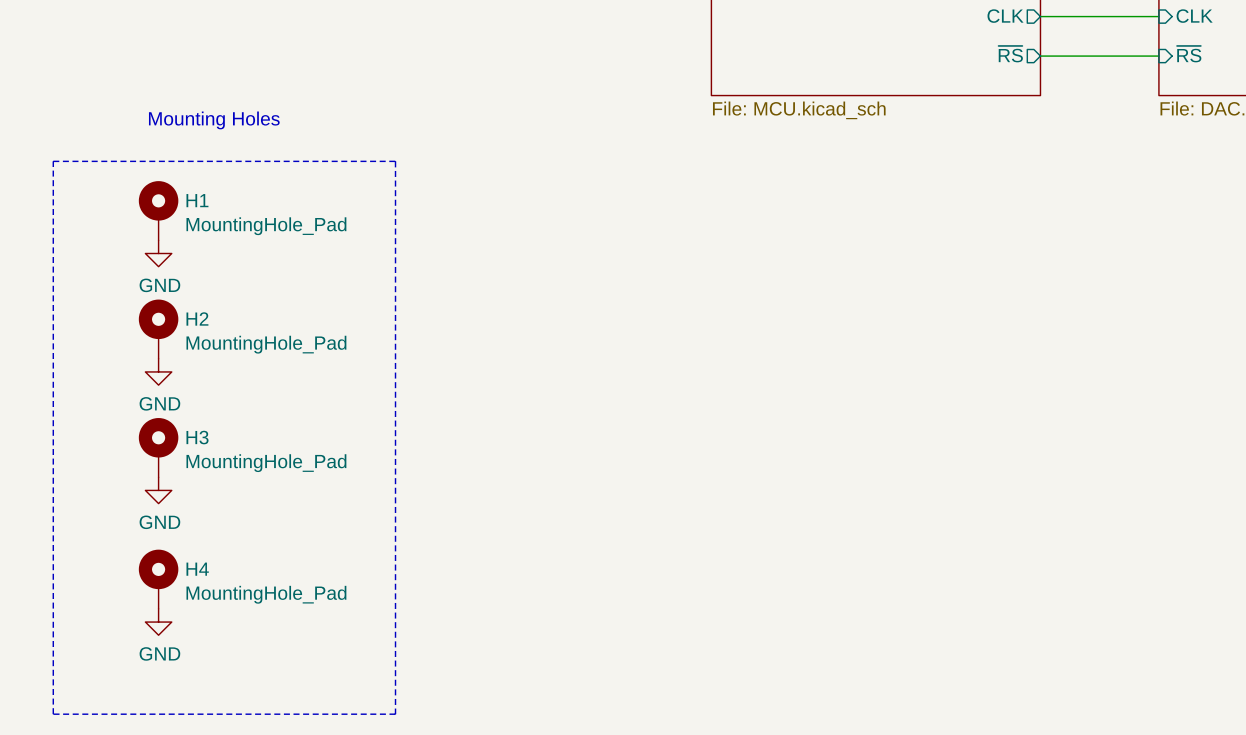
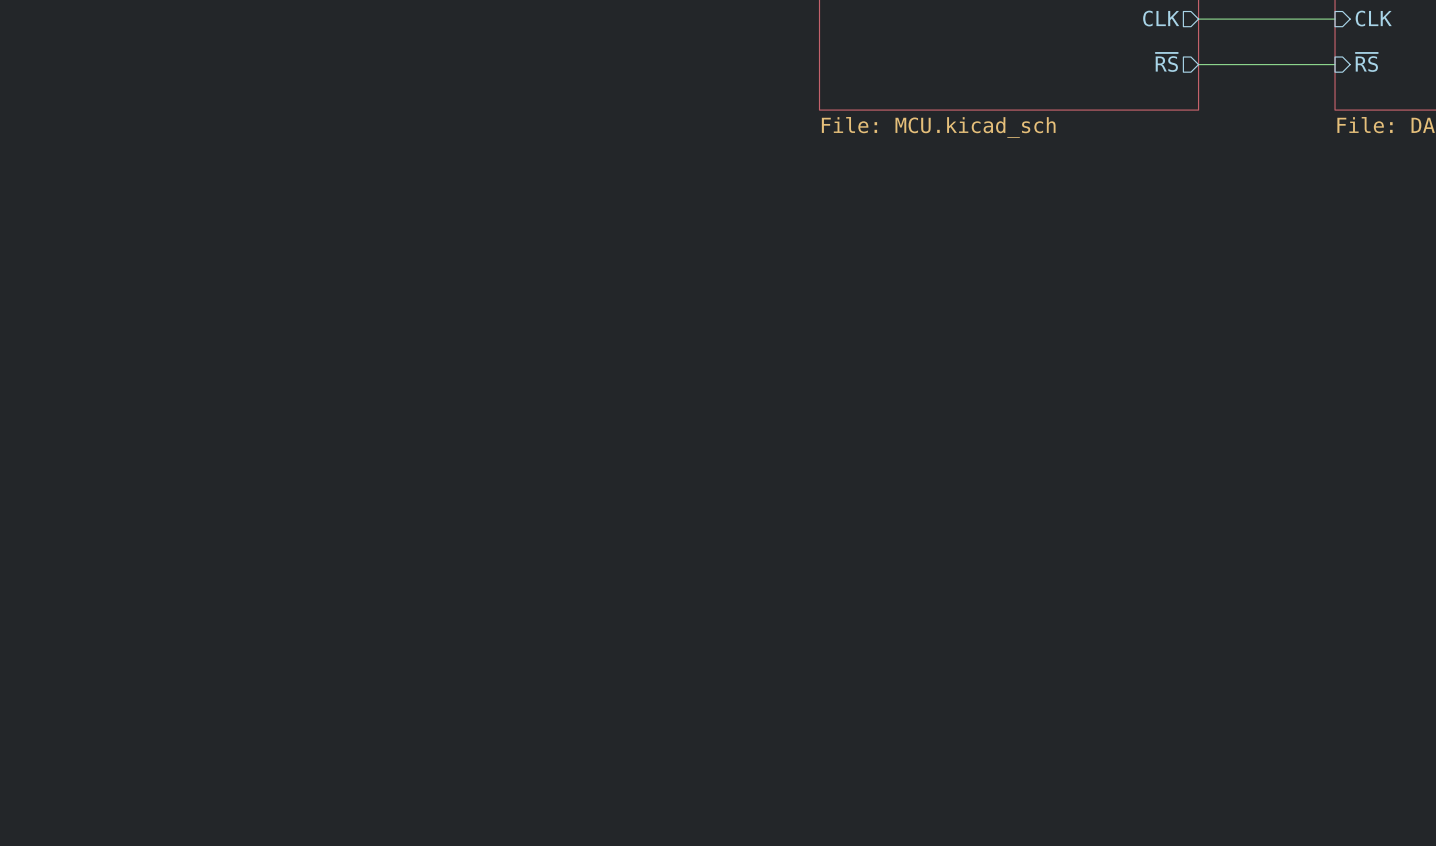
text: Mounting Holes (214, 120) -> none
line: (53, 161) (395, 161) (395, 714) (53, 714) (53, 161) -> none
H1: MountingHole_Pad (158, 210) -> none
power symbol: GND (158, 253) -> none
H2: MountingHole_Pad (158, 329) -> none
power symbol: GND (158, 371) -> none
H3: MountingHole_Pad (158, 447) -> none
power symbol: GND (158, 490) -> none
H4: MountingHole_Pad (158, 579) -> none
power symbol: GND (158, 622) -> none

